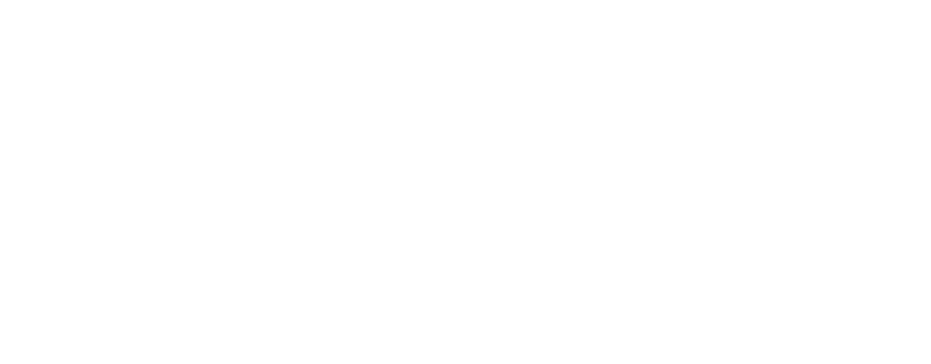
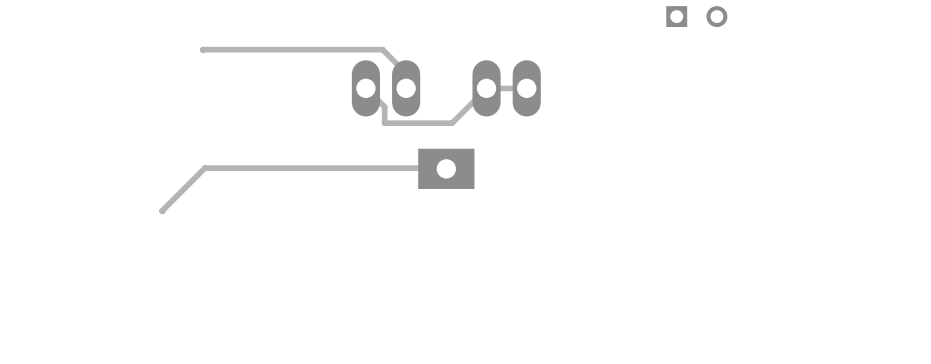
part: none -> (696, 16)
track: none -> (203, 50) (382, 49) (407, 74) (406, 88)
track: none -> (526, 88) (486, 88) (452, 123) (384, 123) (384, 106) (365, 88)
part: none -> (446, 124)
track: none -> (446, 168) (204, 168) (162, 211)

